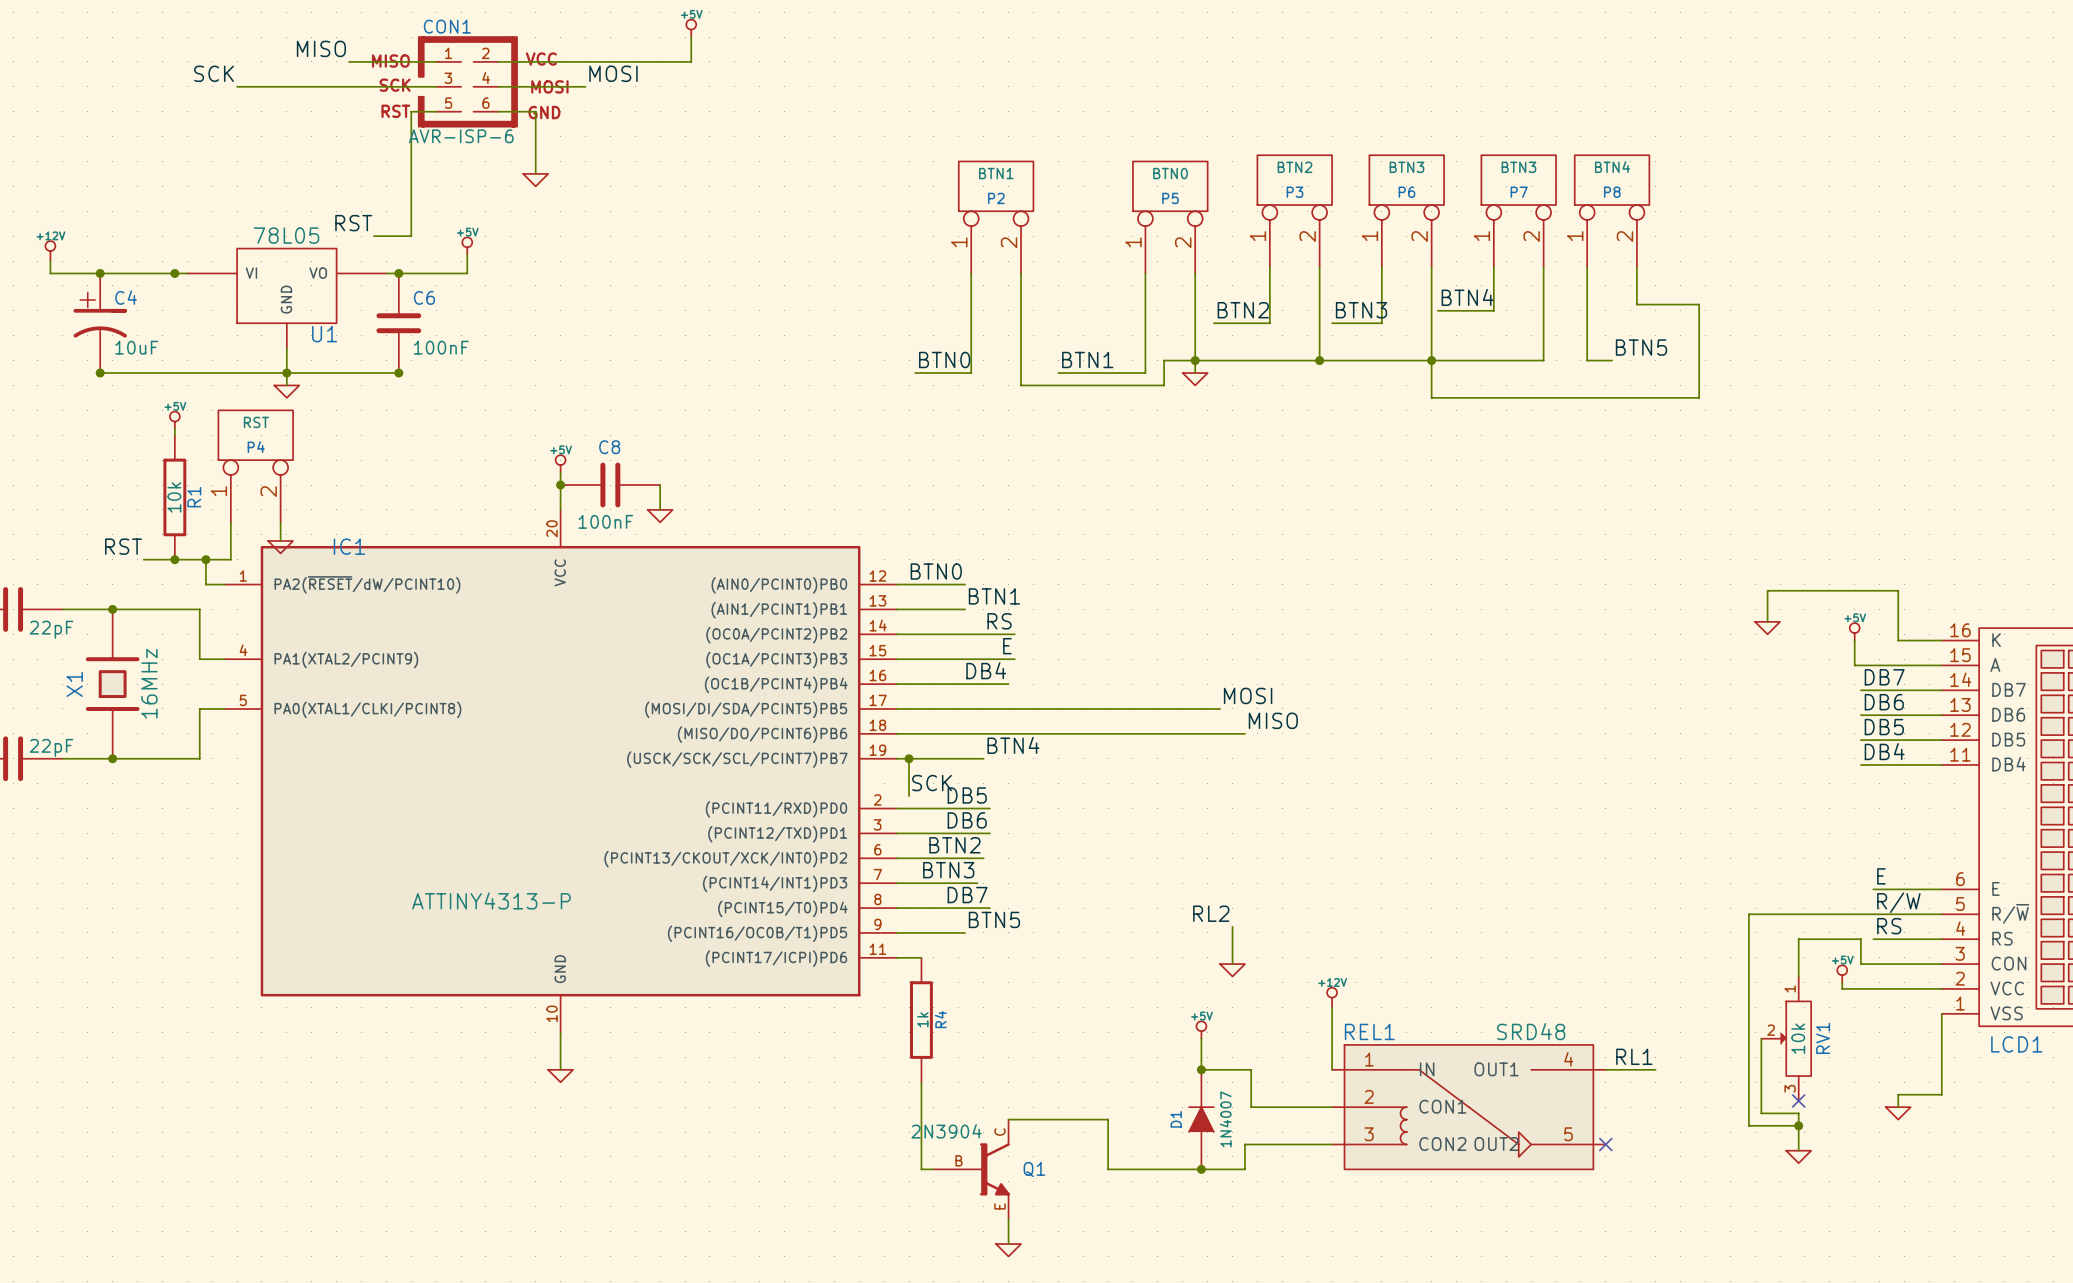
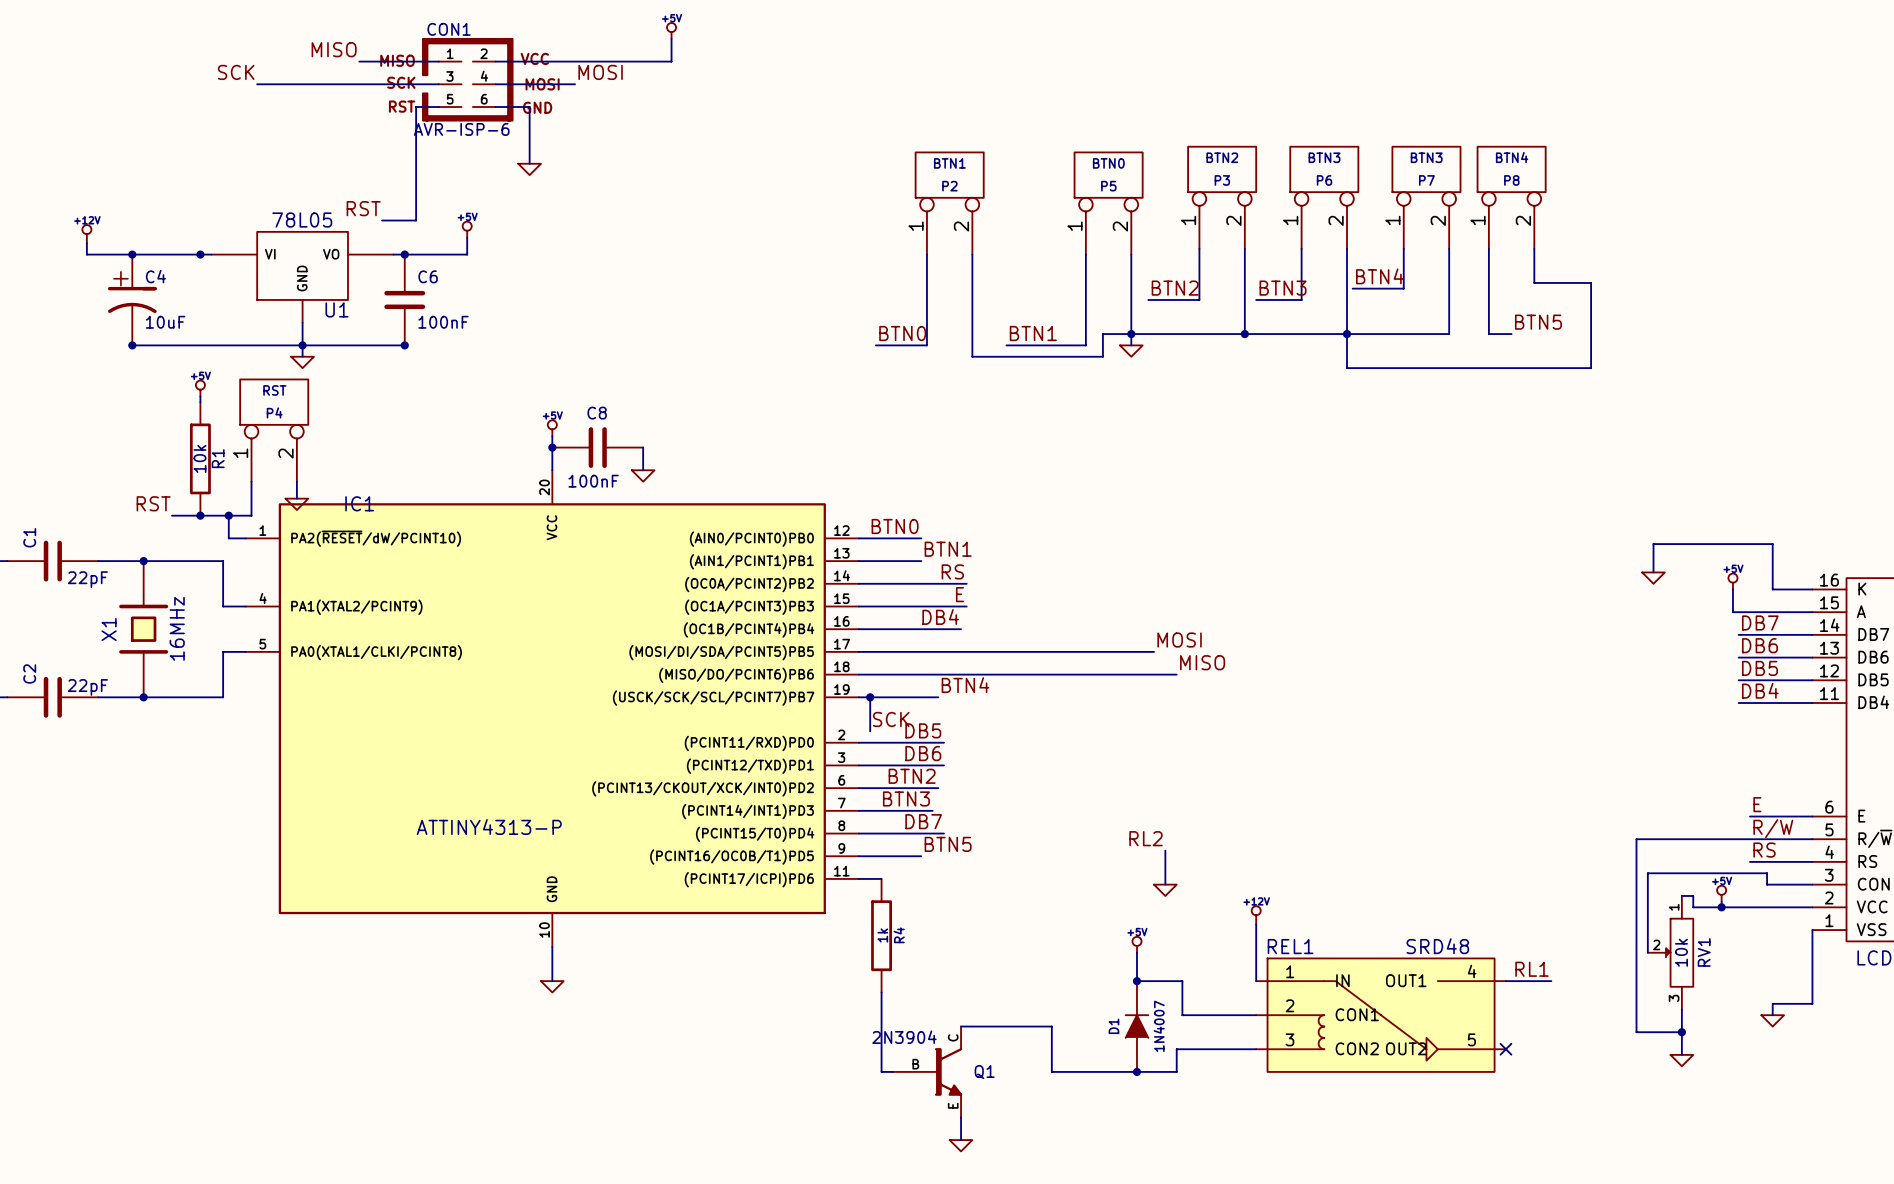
wire: (1892, 964) (1860, 964) (1860, 939) (1798, 939) (1798, 976) -> (1721, 907) (1693, 907) (1693, 895) (1681, 895)
wire: none -> (1767, 884) (1767, 873) (1647, 873) (1647, 952)
junction: none -> (1721, 907)
wire: (1761, 1038) (1761, 1113) (1798, 1113) -> (1681, 1009) (1681, 1020)
no-connect mark: (1798, 1100) -> none

